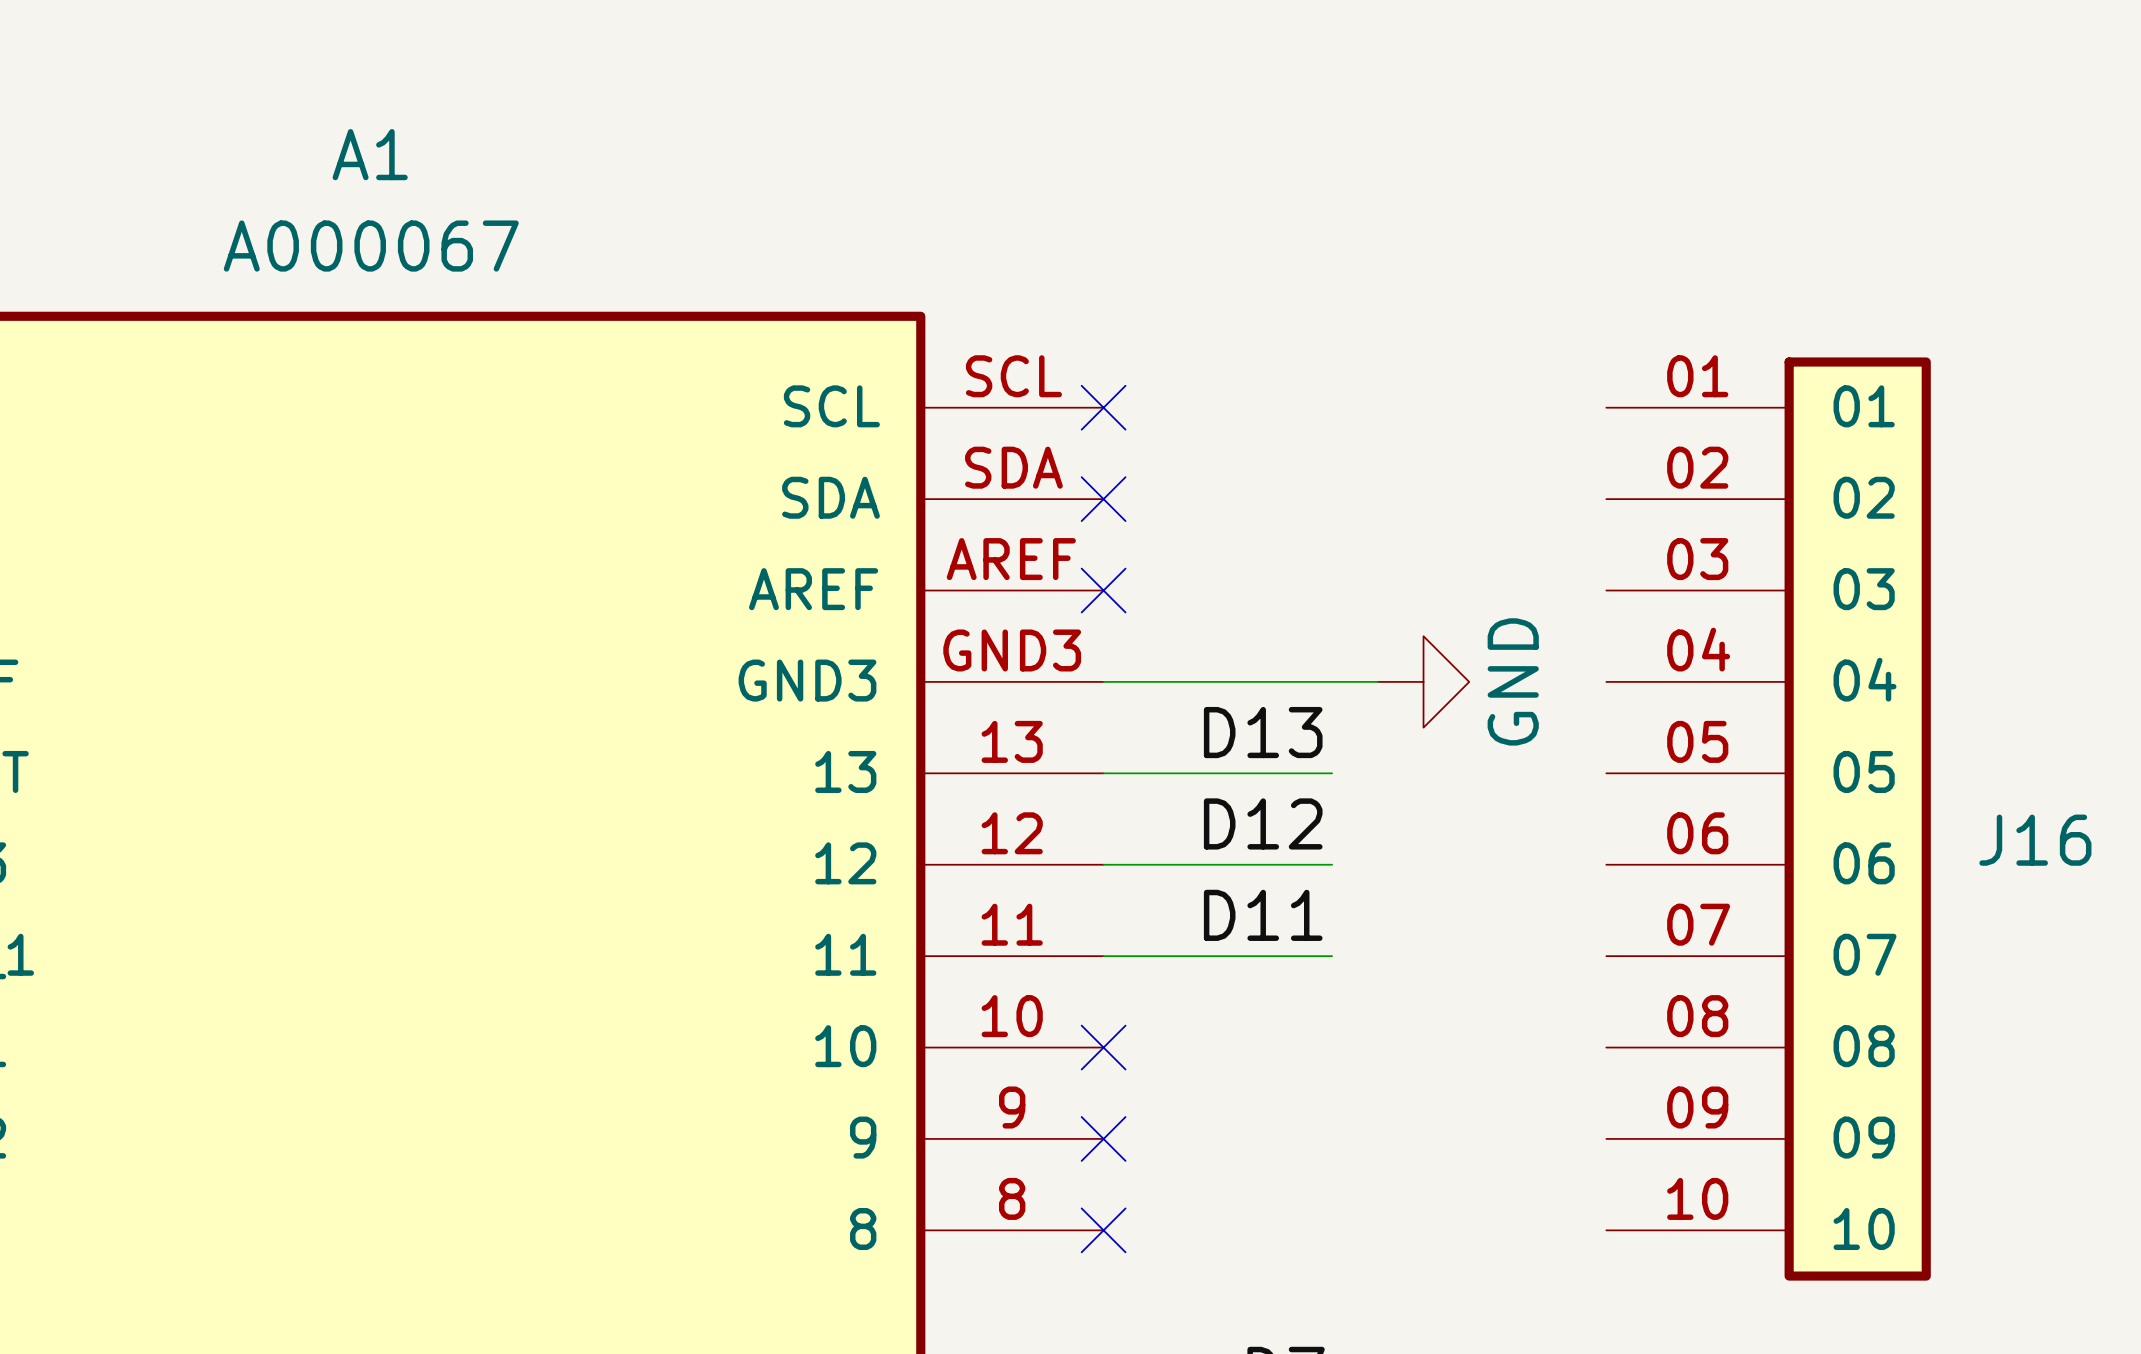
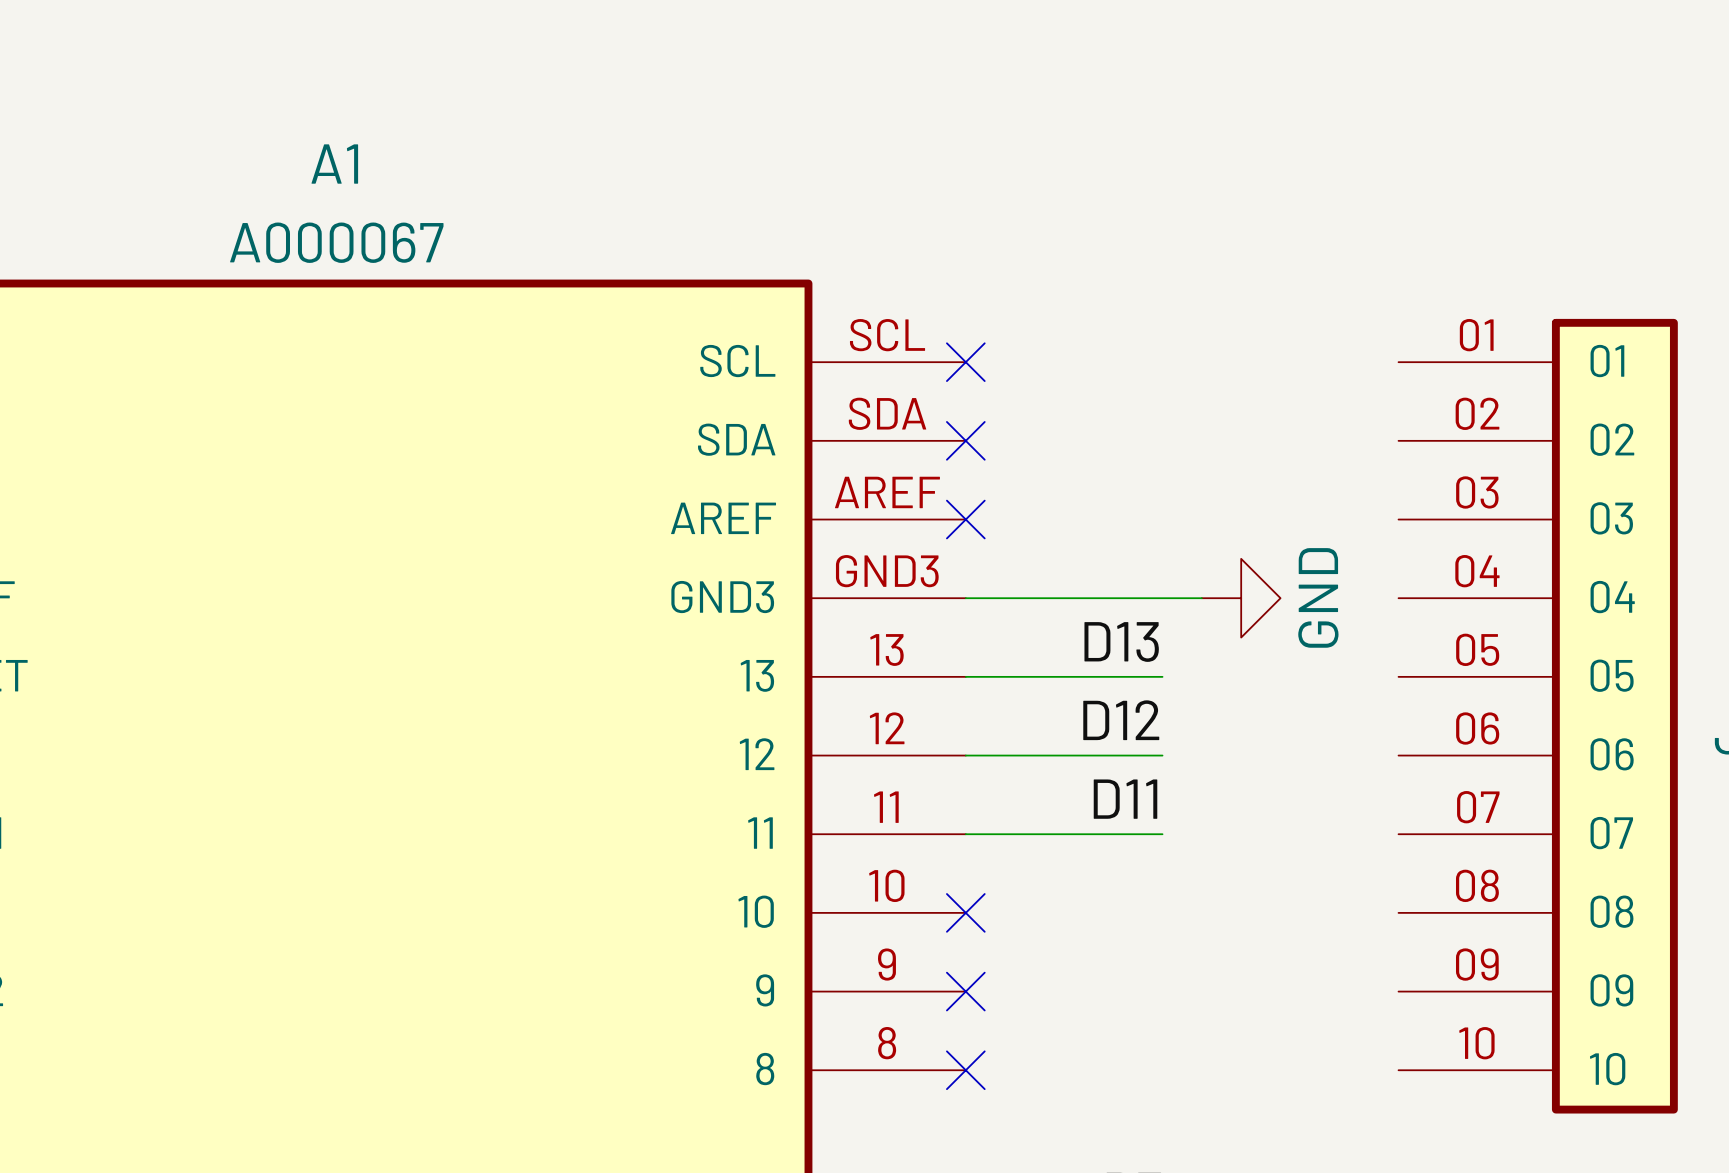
A1 name position: A1 (370, 154) -> A1 (334, 164)
A1 value position: A000067 (371, 246) -> A000067 (336, 242)

